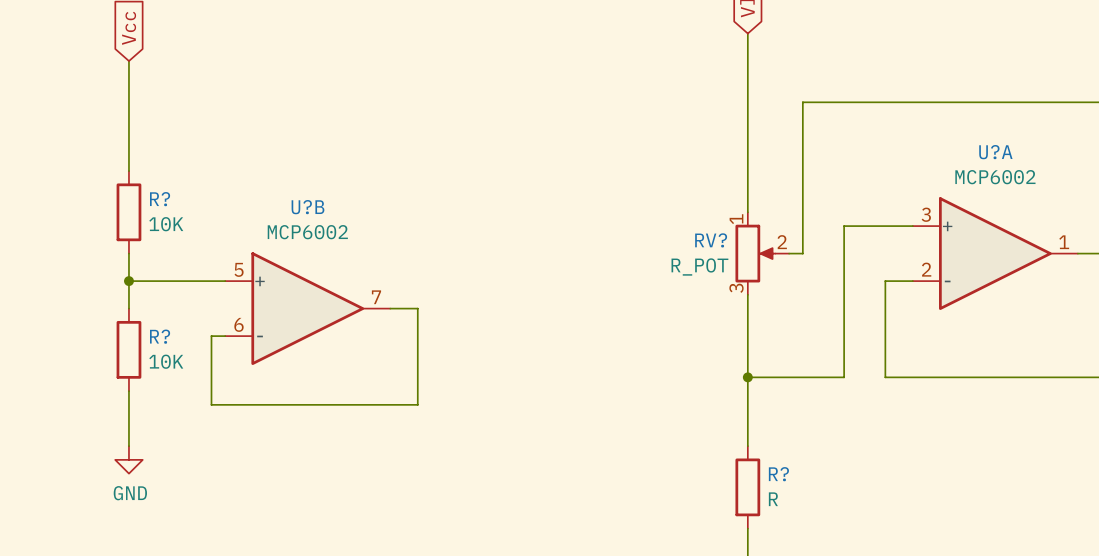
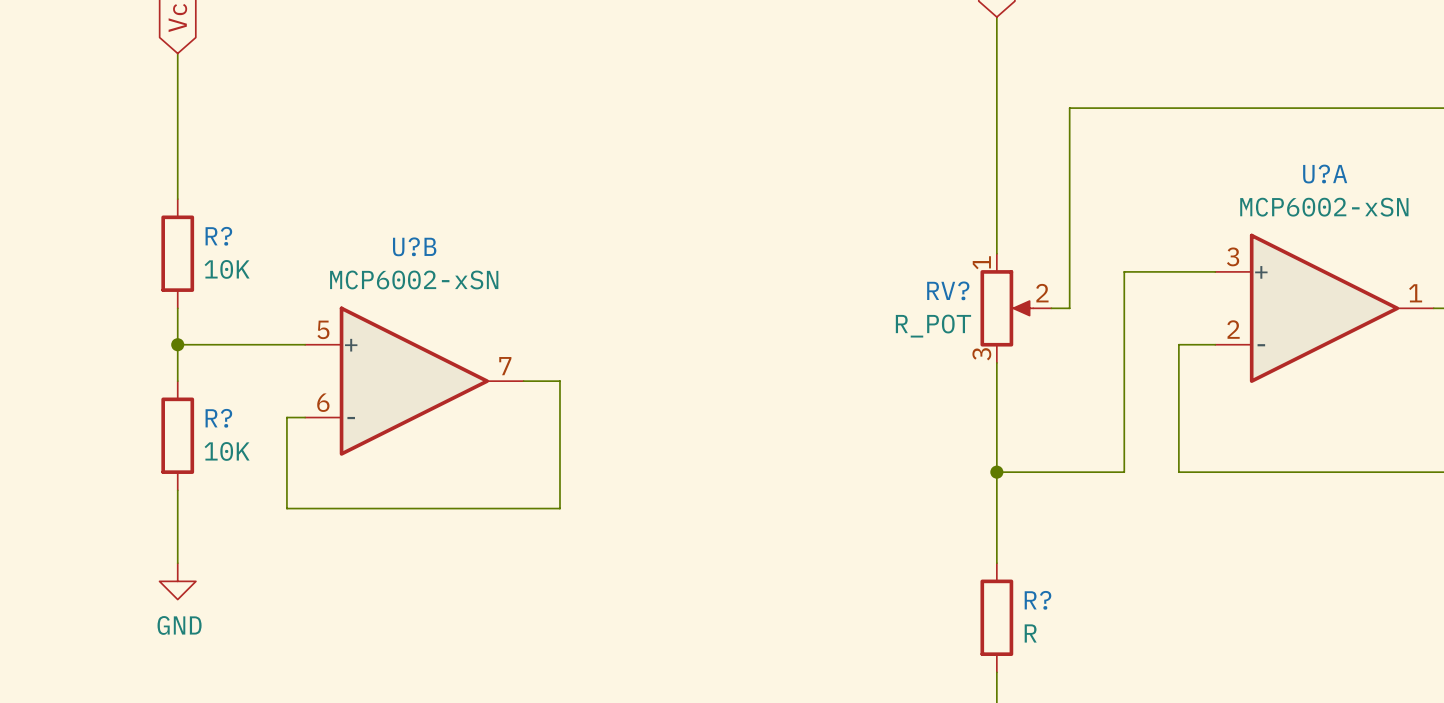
U?A value: MCP6002 (995, 177) -> MCP6002-xSN (1324, 207)
U?B value: MCP6002 (307, 232) -> MCP6002-xSN (414, 279)

